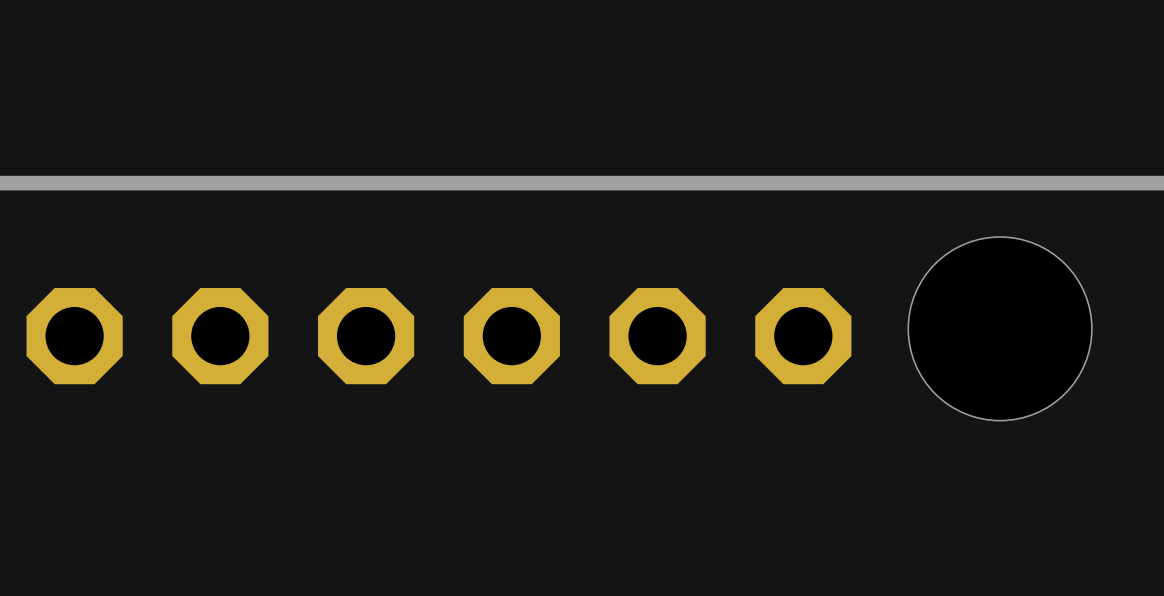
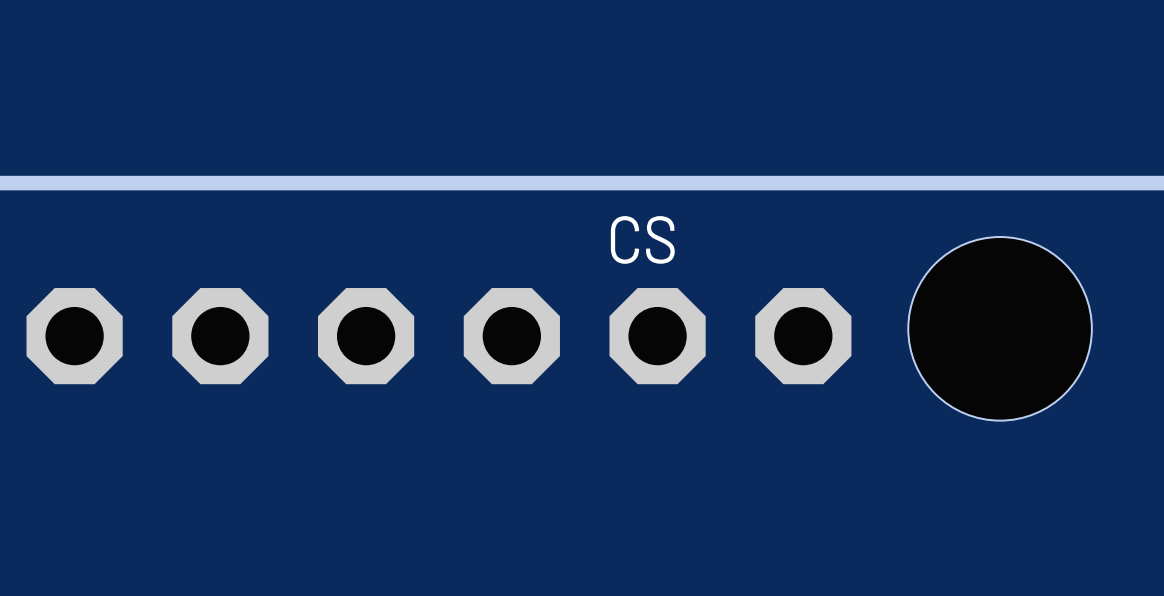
text: none -> CS (642, 239)

